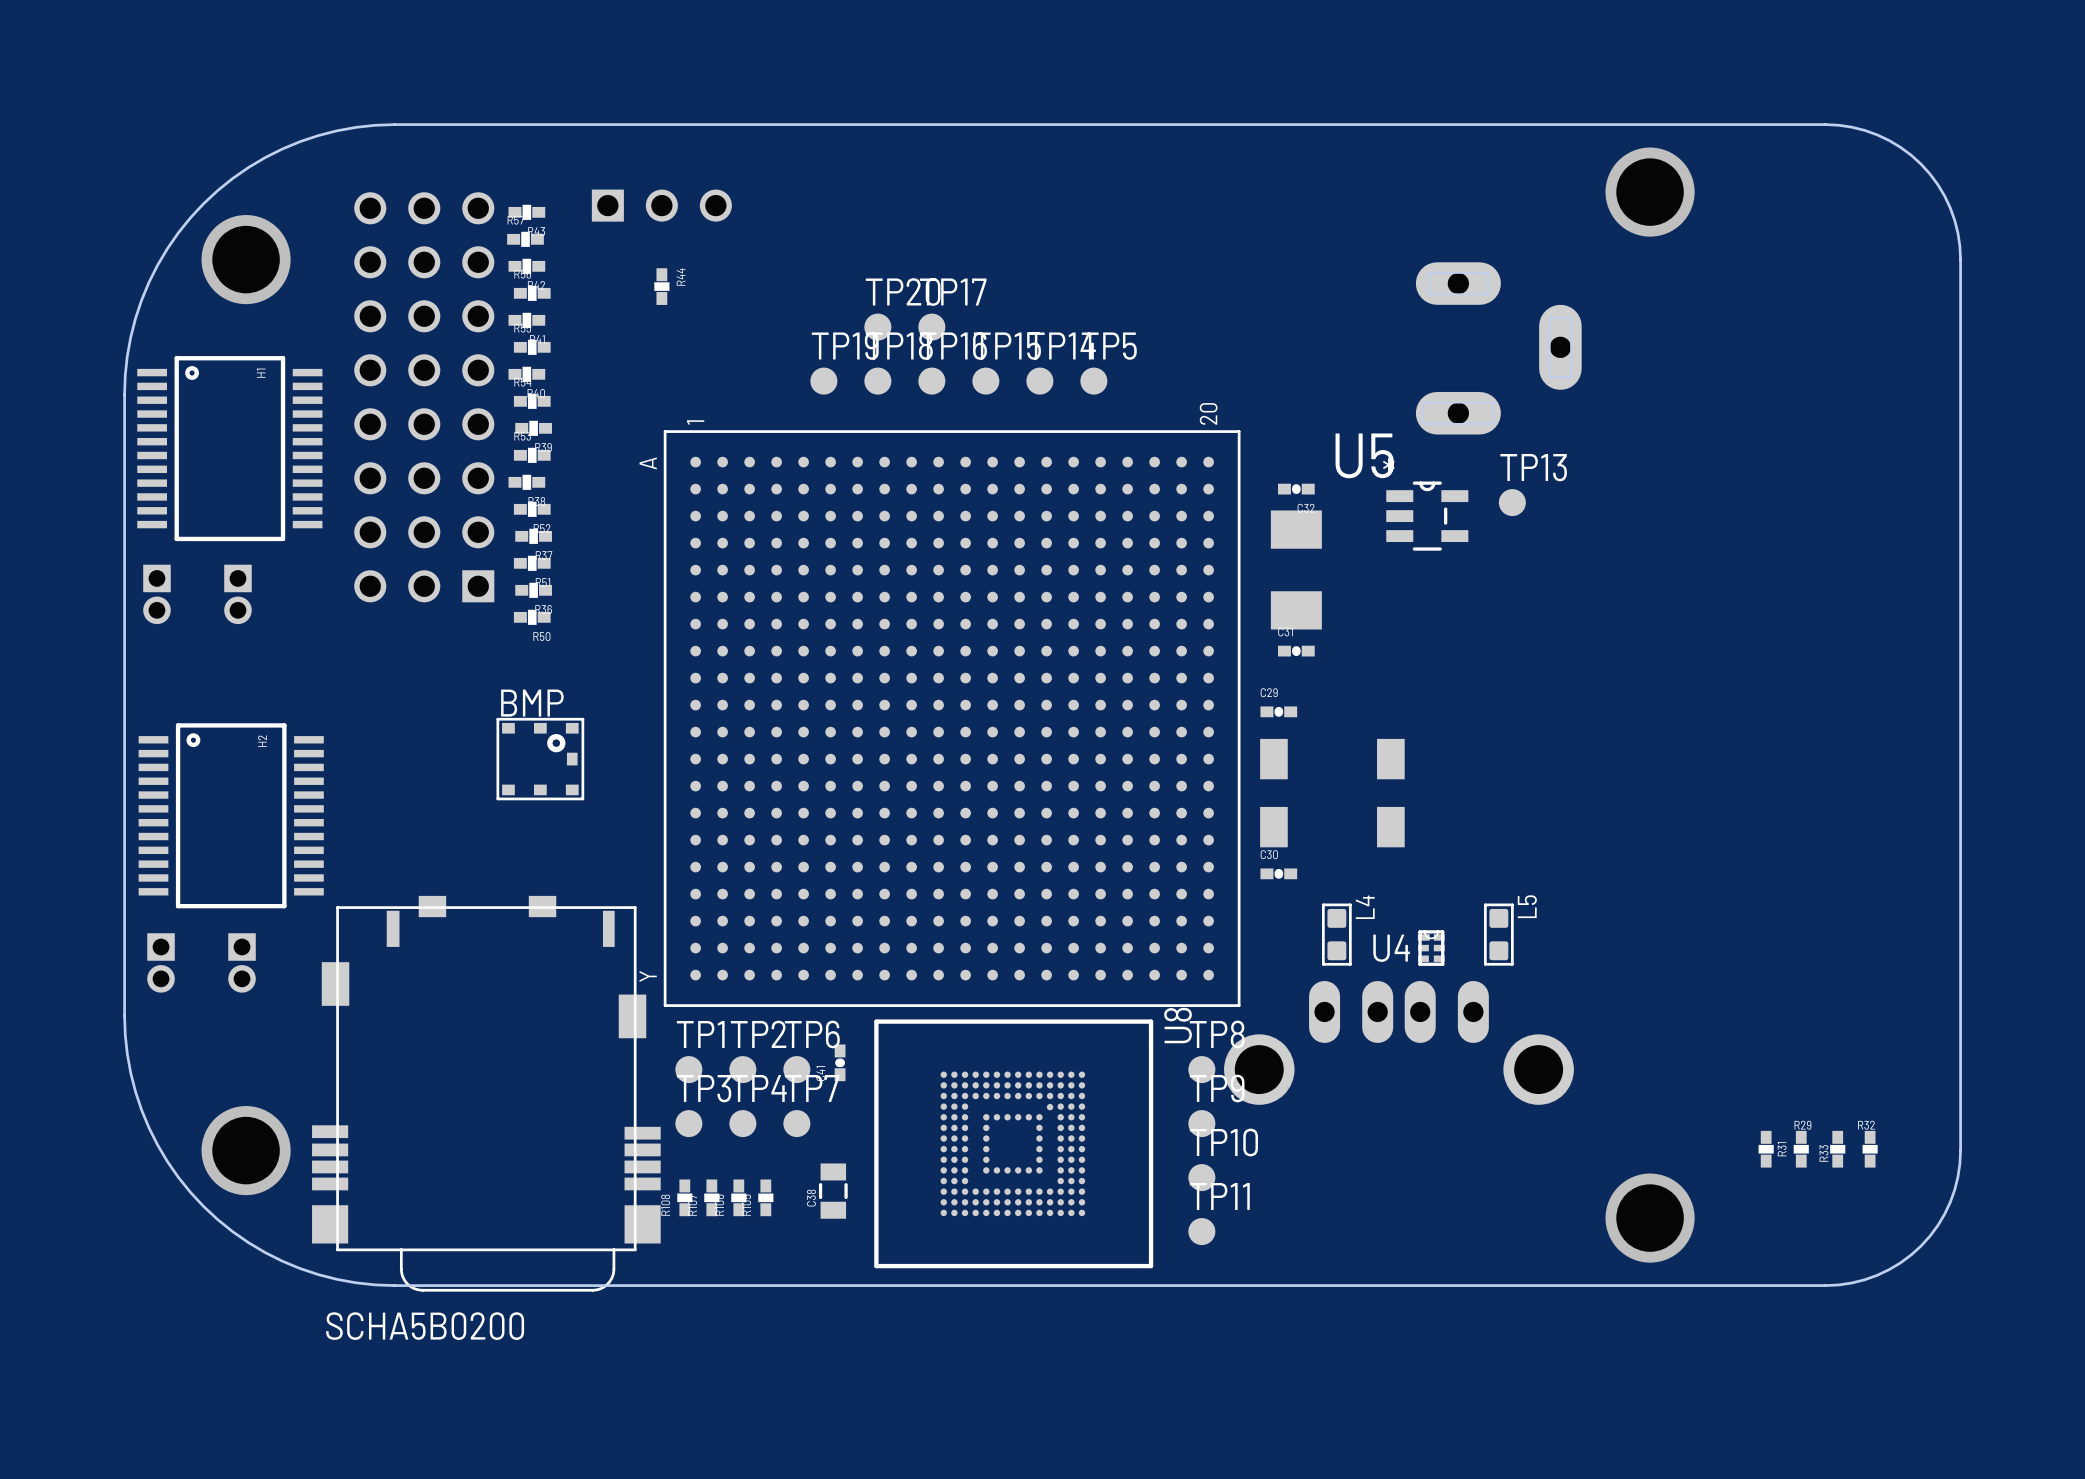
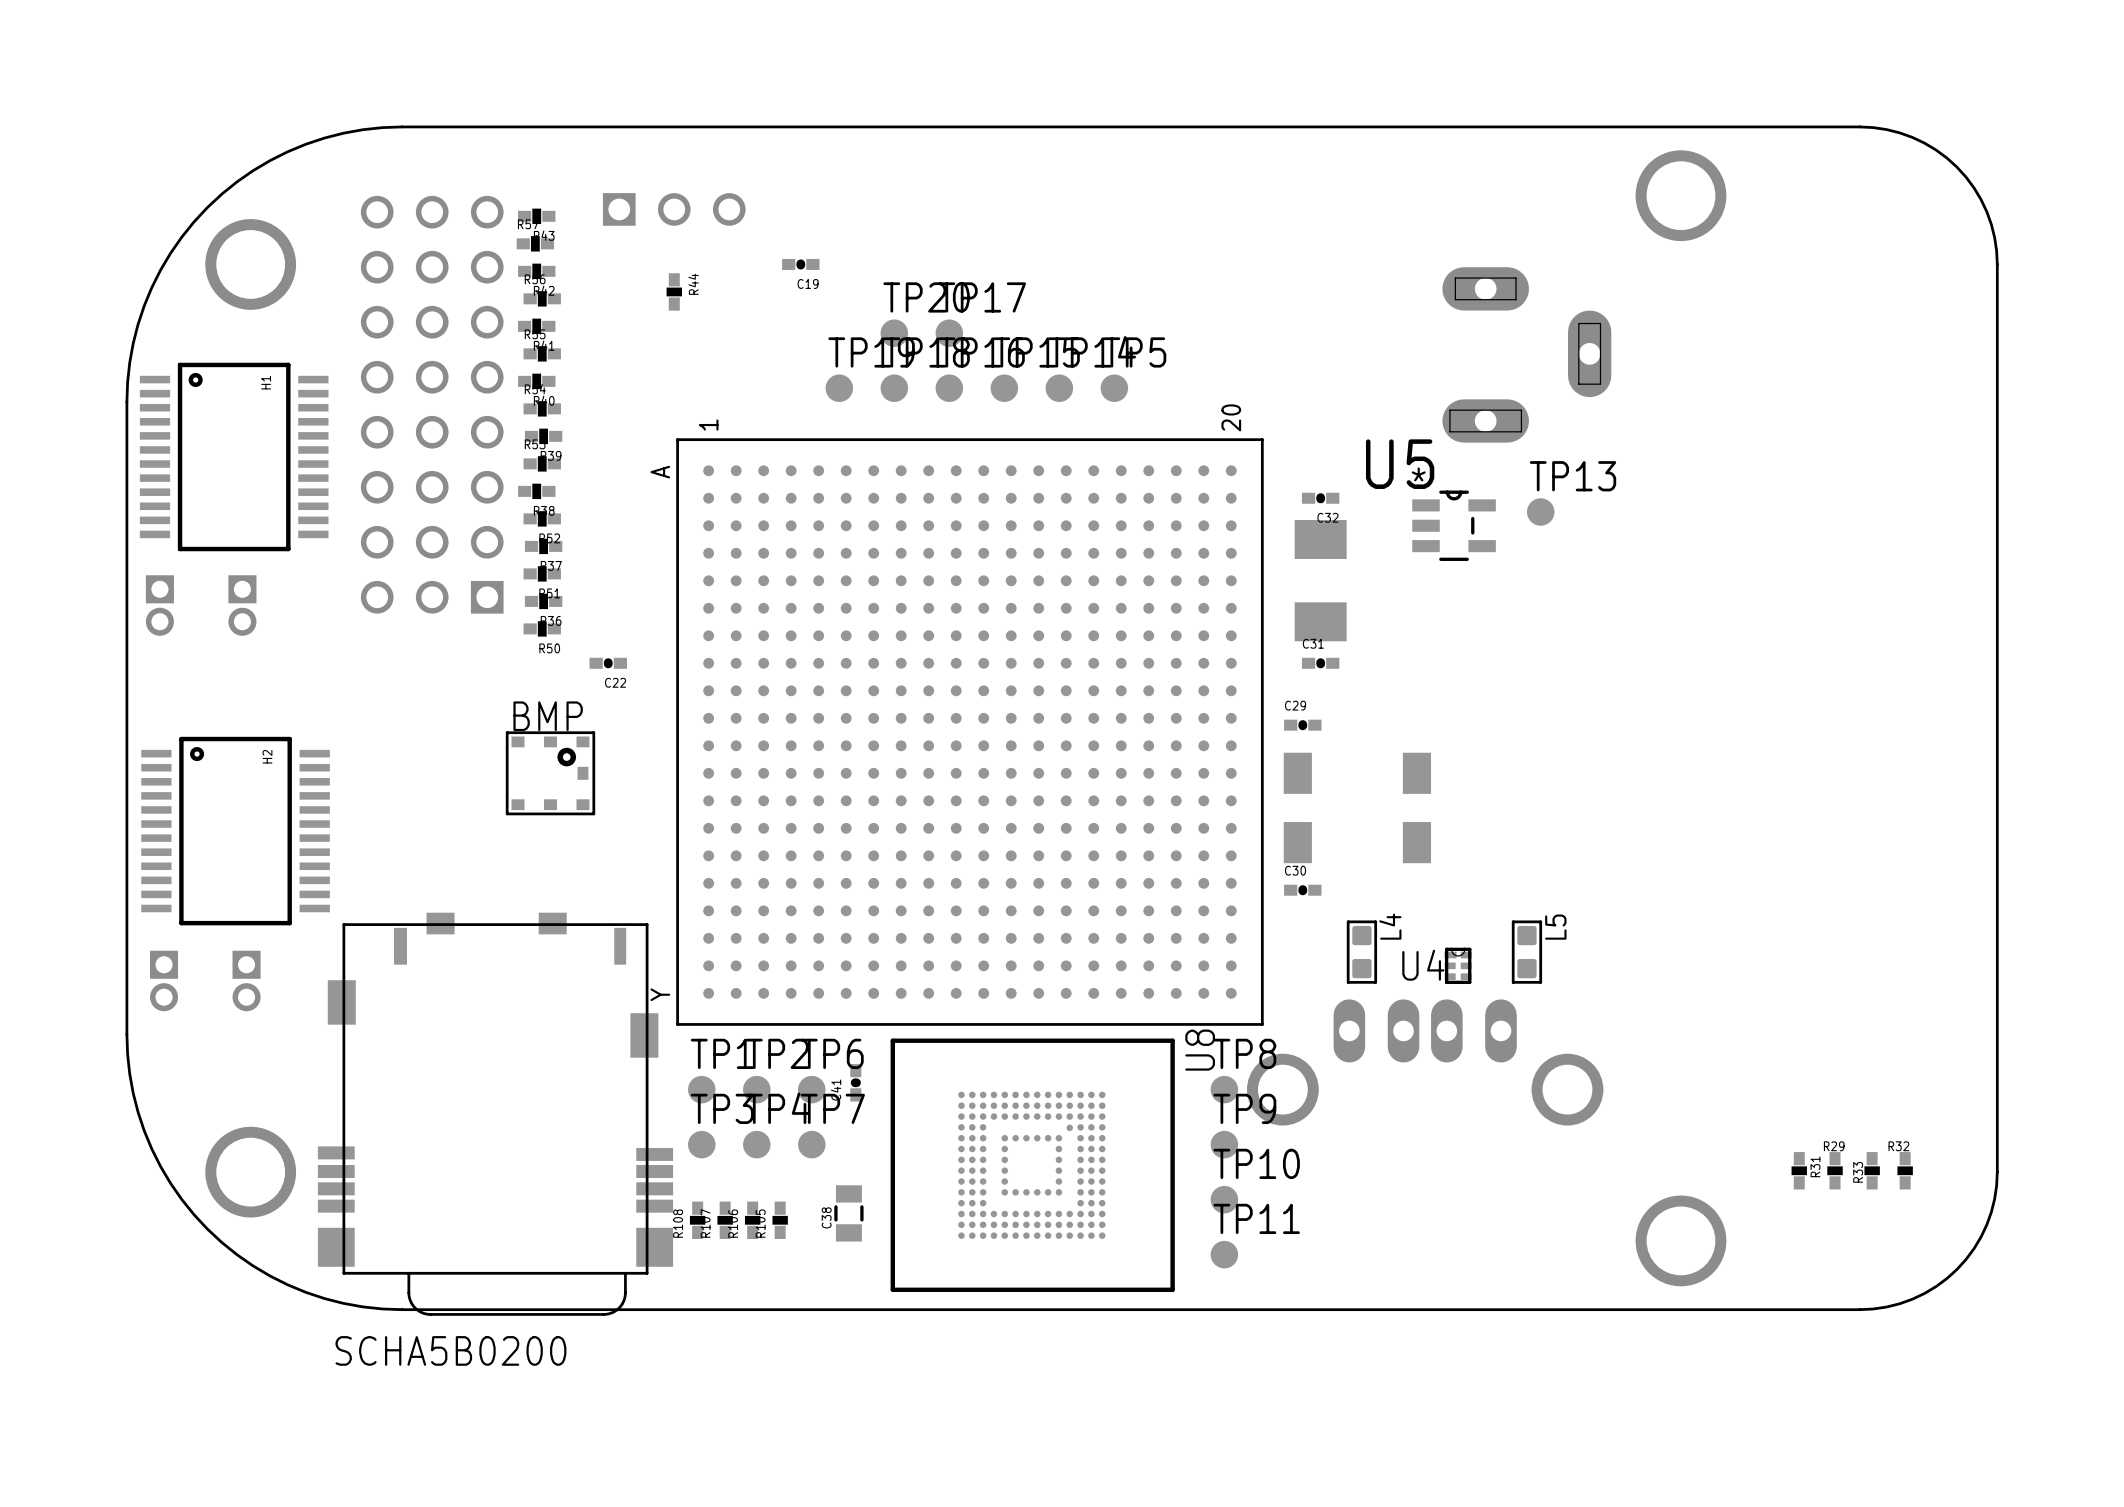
C19: none -> (800, 264)
C22: none -> (608, 663)

